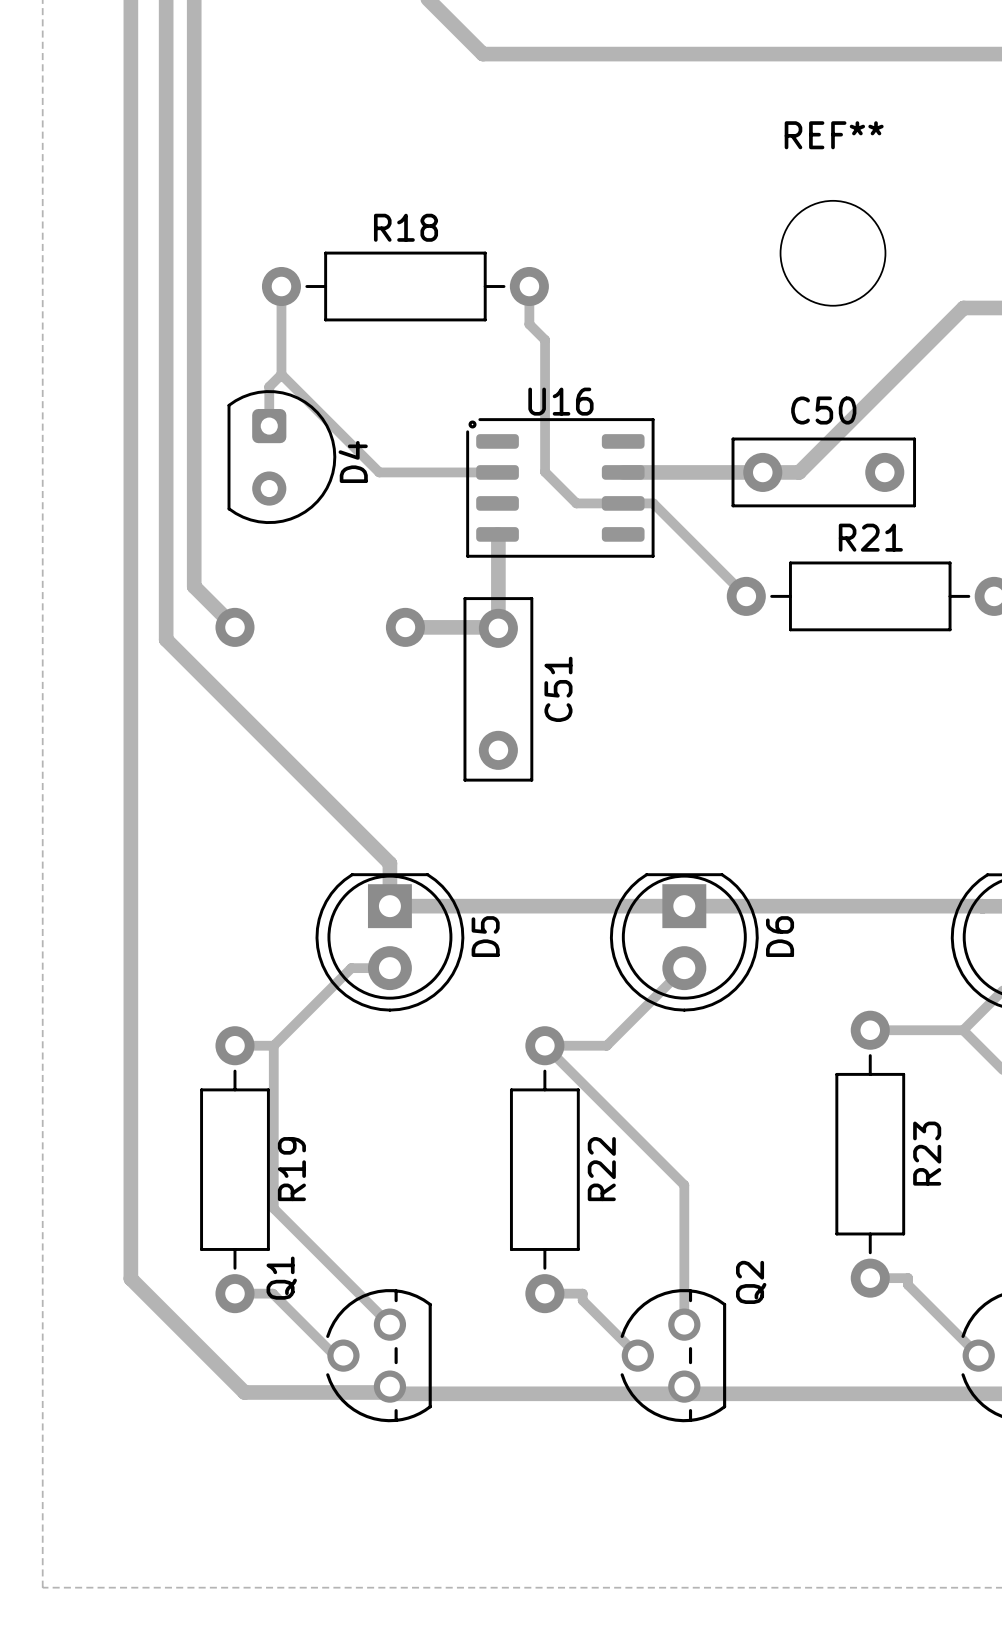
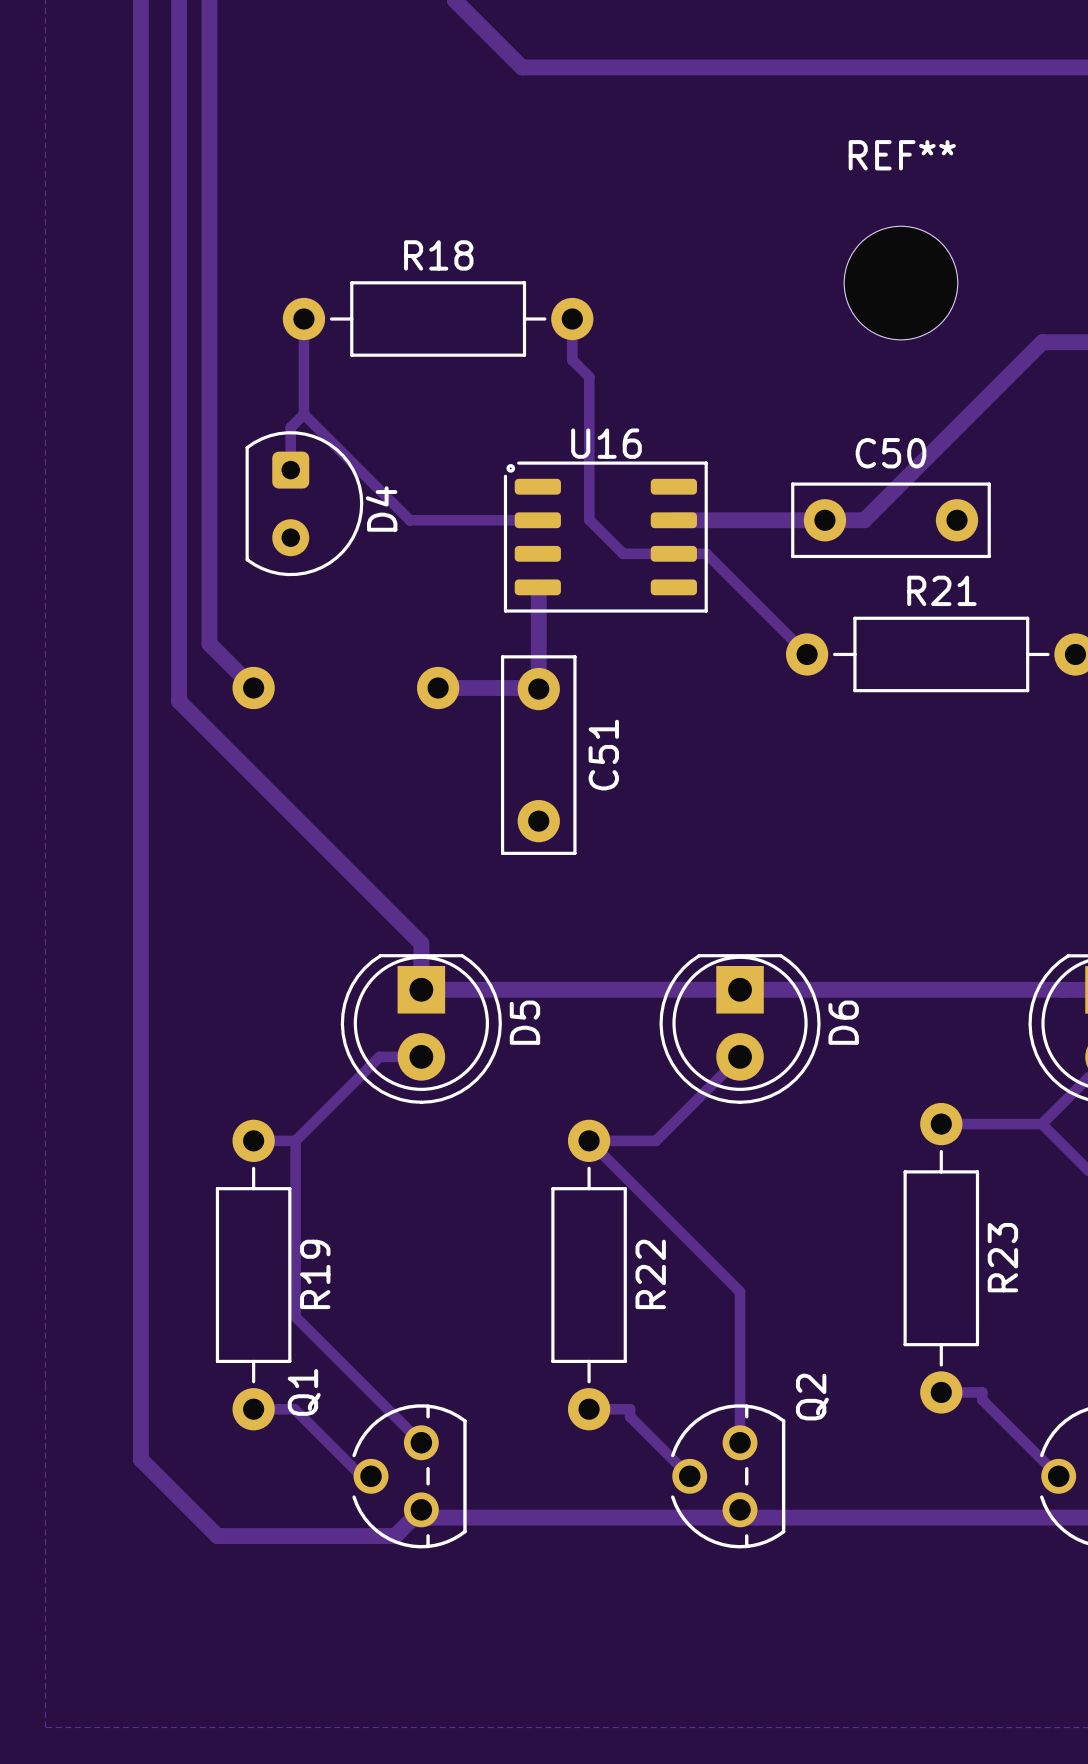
track: (130, 1278) (244, 1392) (384, 1392) -> (140, 1393) (140, 1459) (217, 1536) (395, 1536) (415, 1516)

